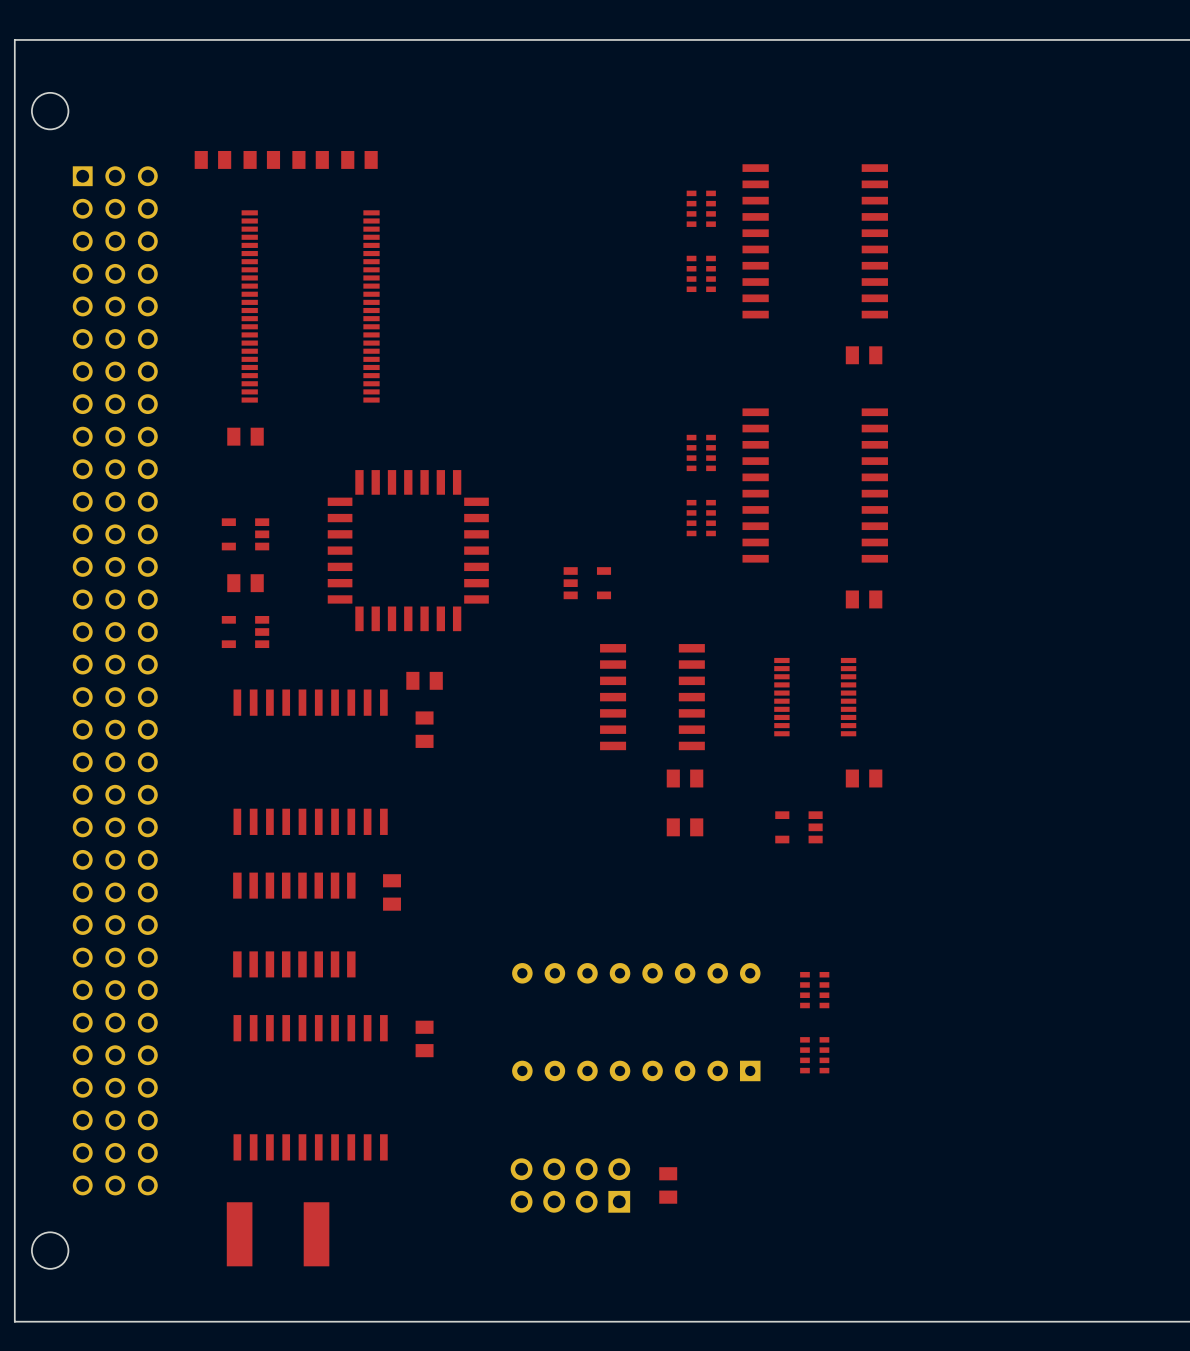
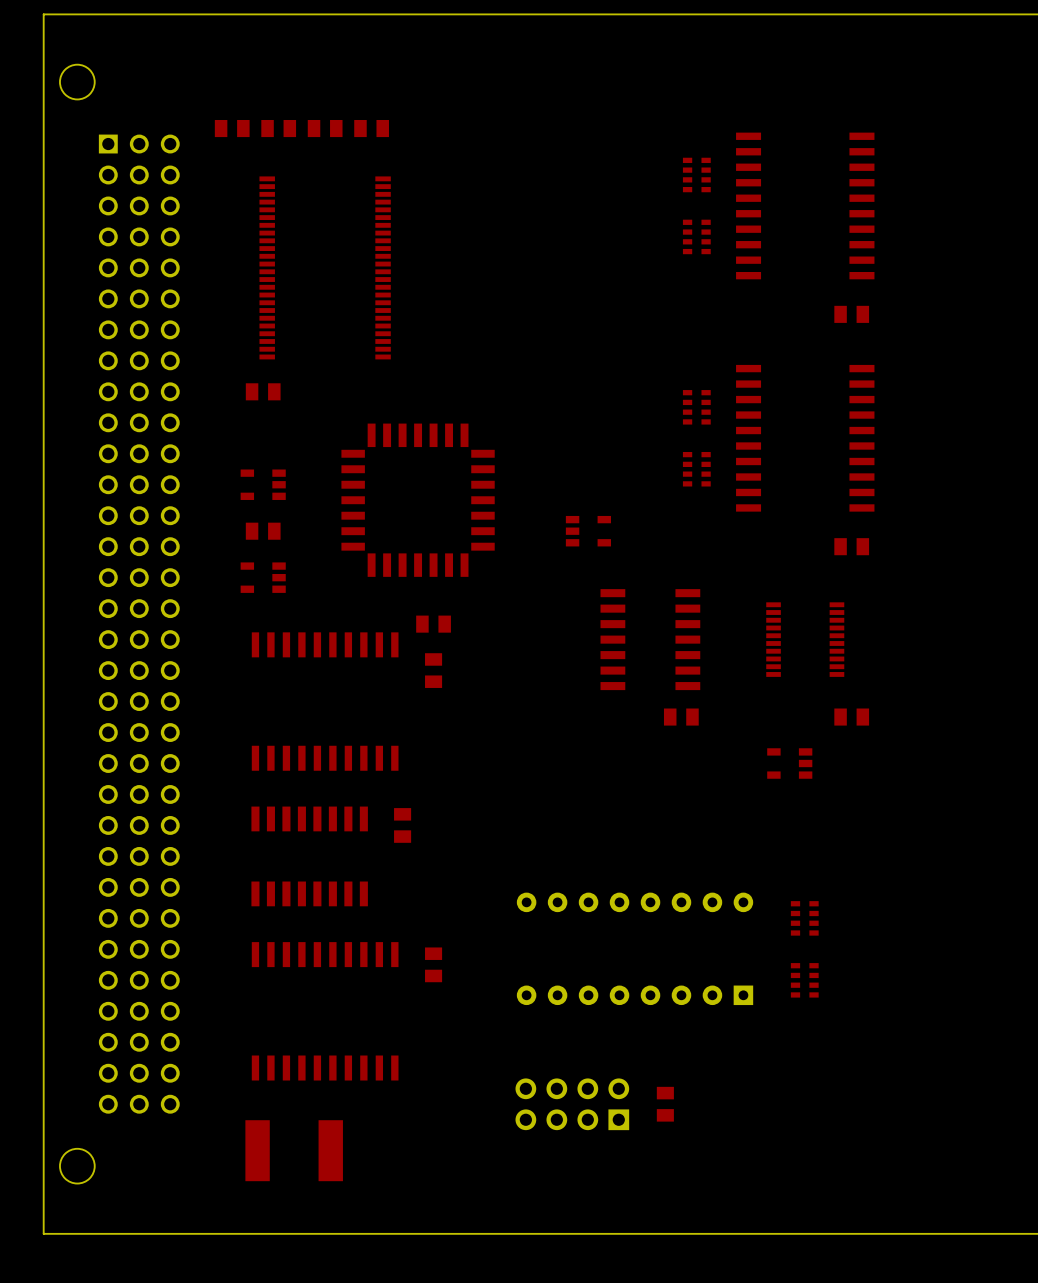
part: (685, 827) -> none

